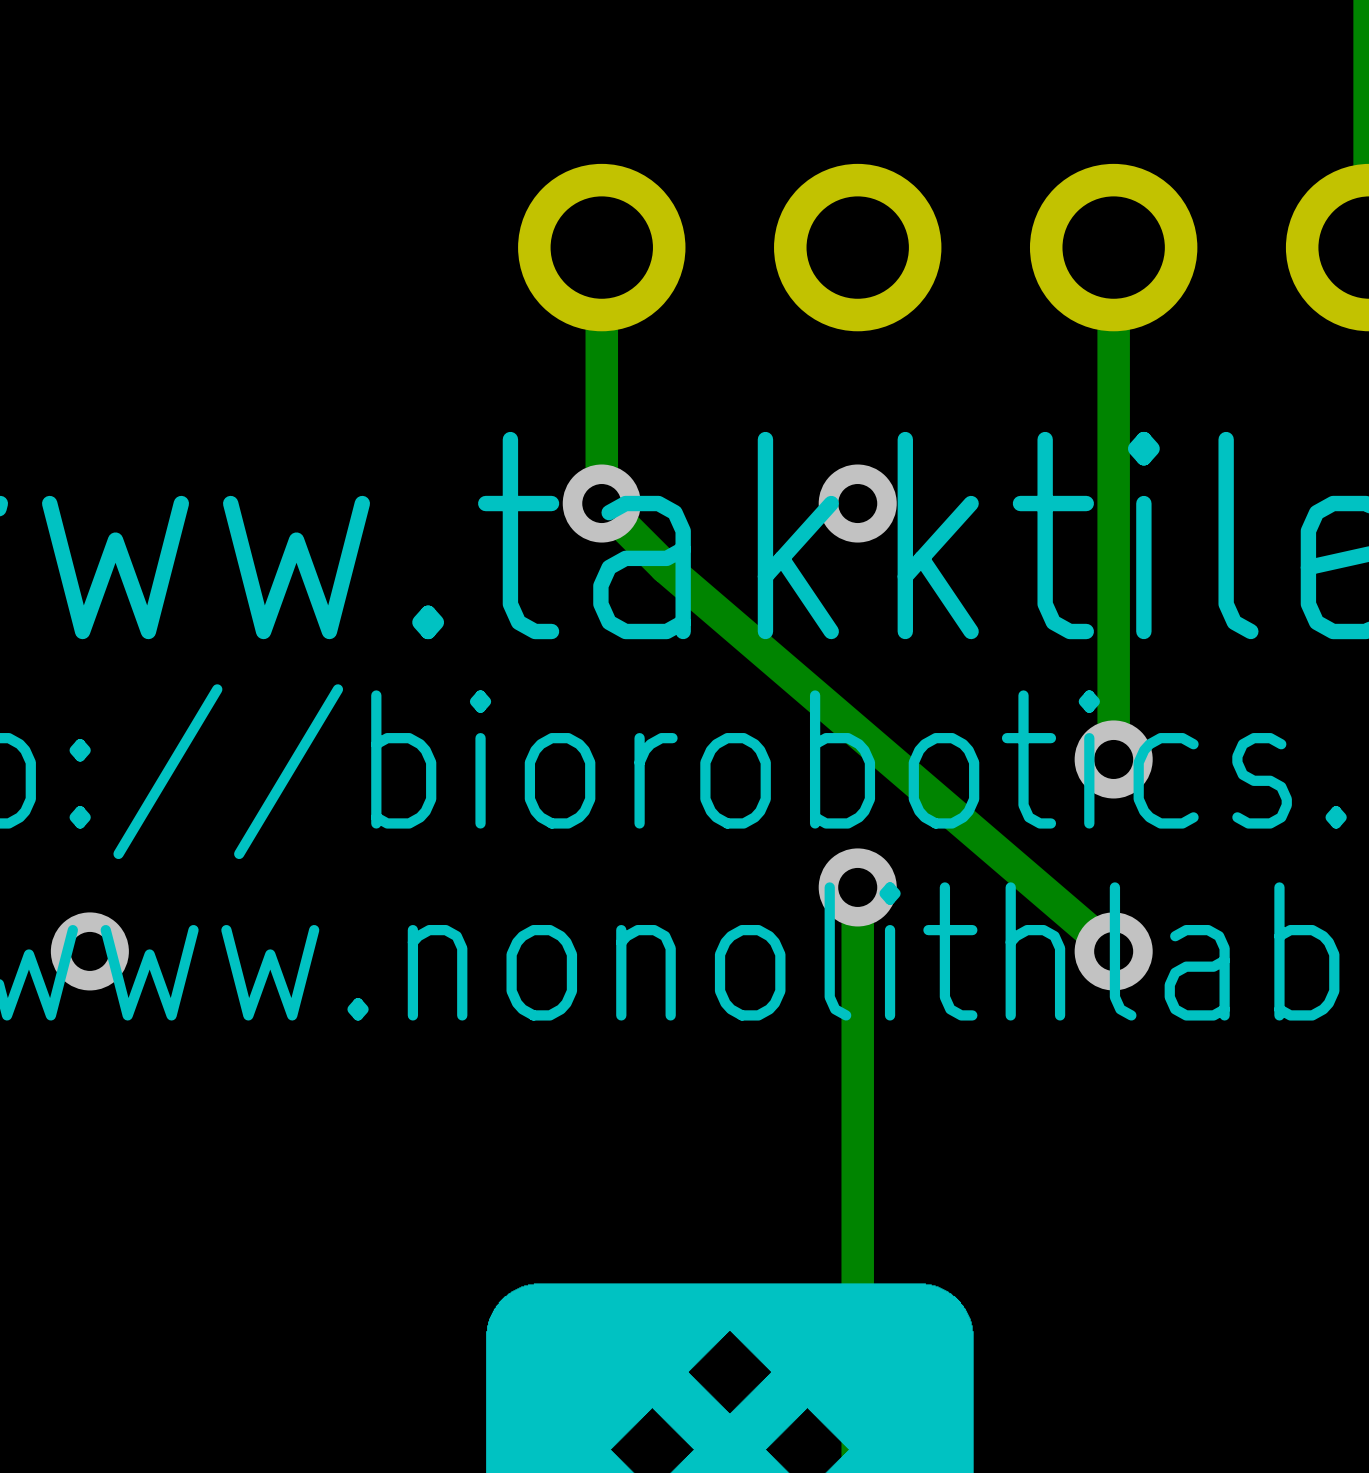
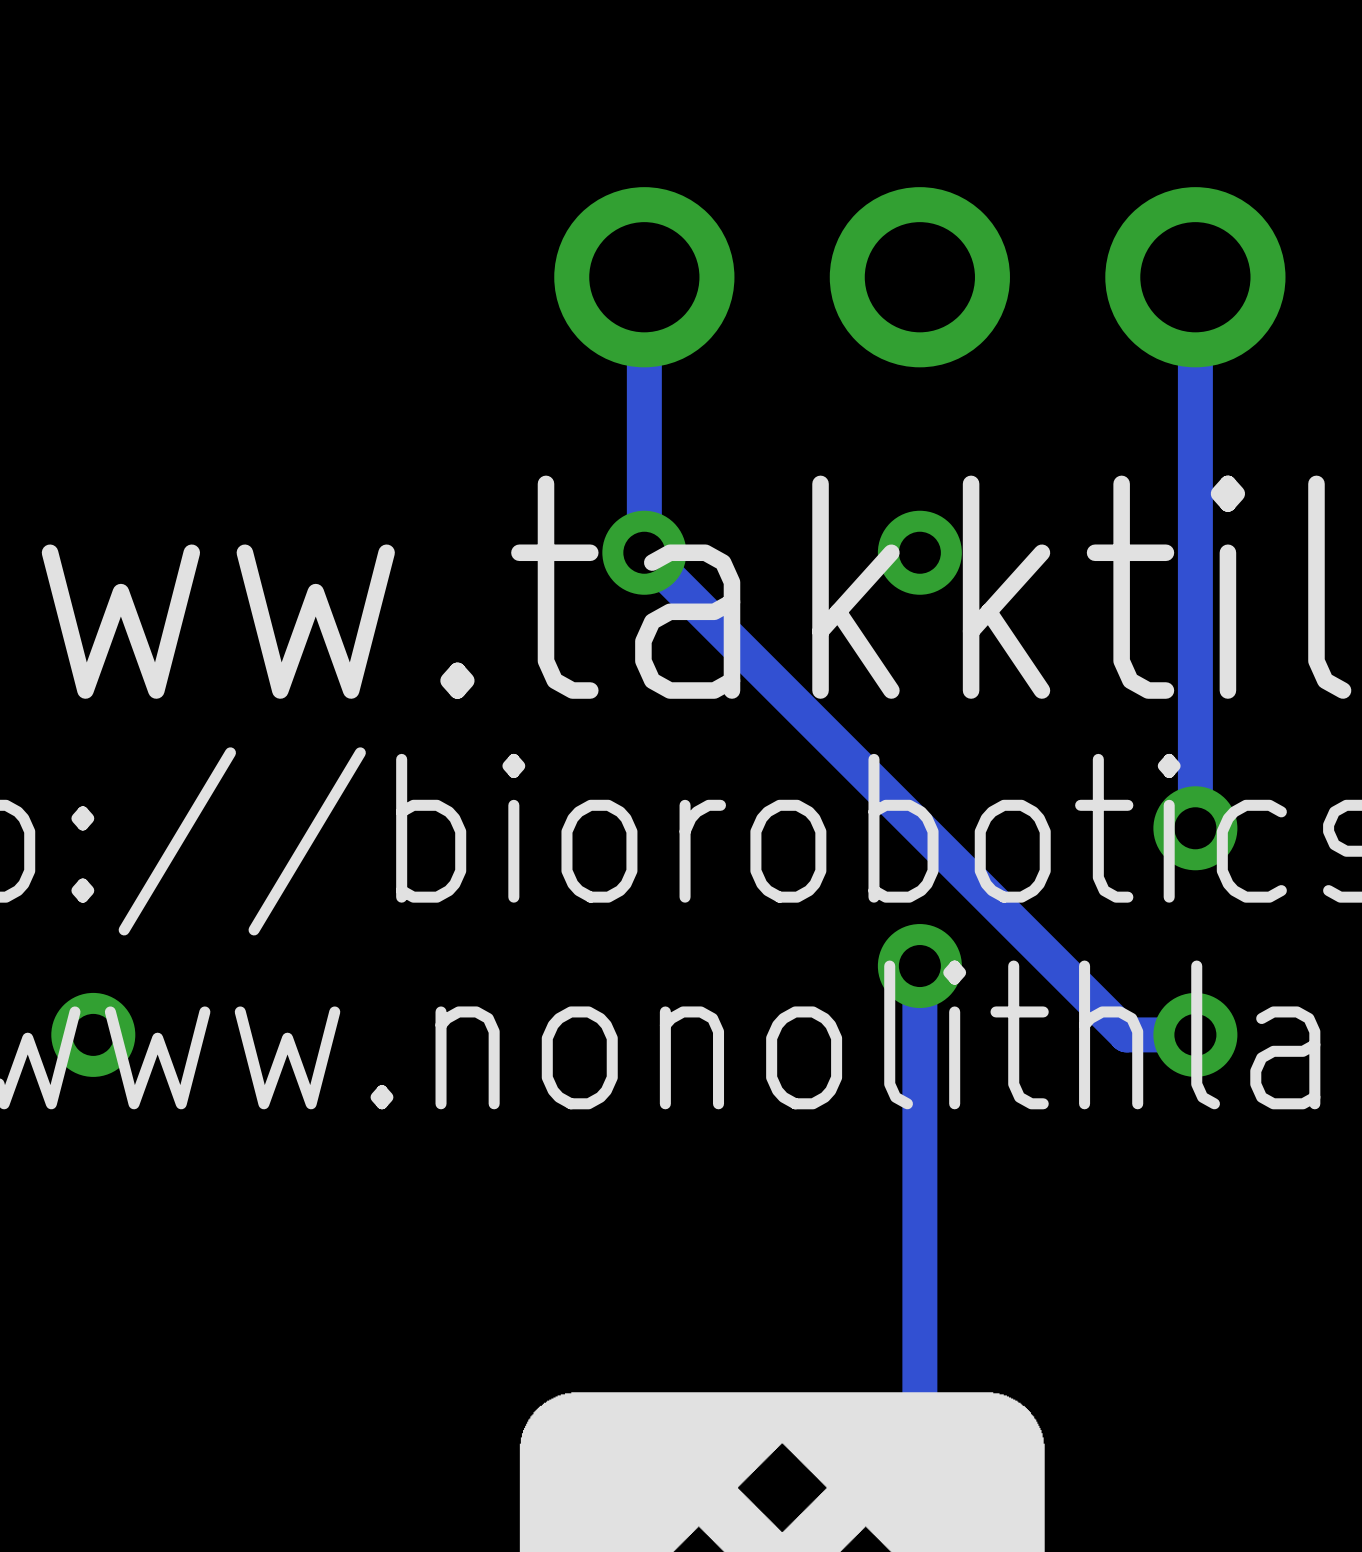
track: (665, 567) (1113, 951) -> (713, 621) (1126, 1034) (1195, 1034)

